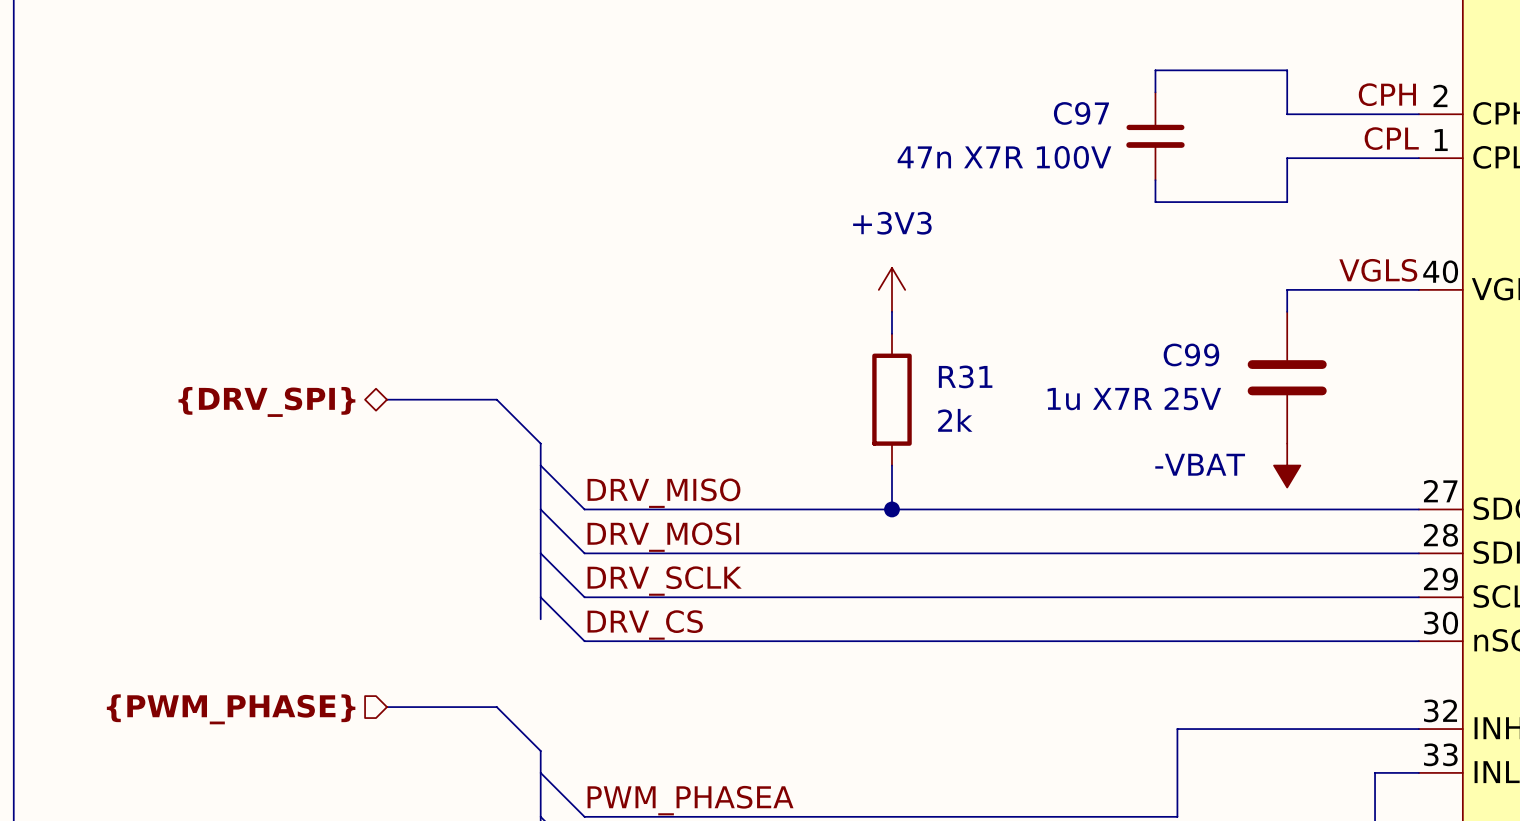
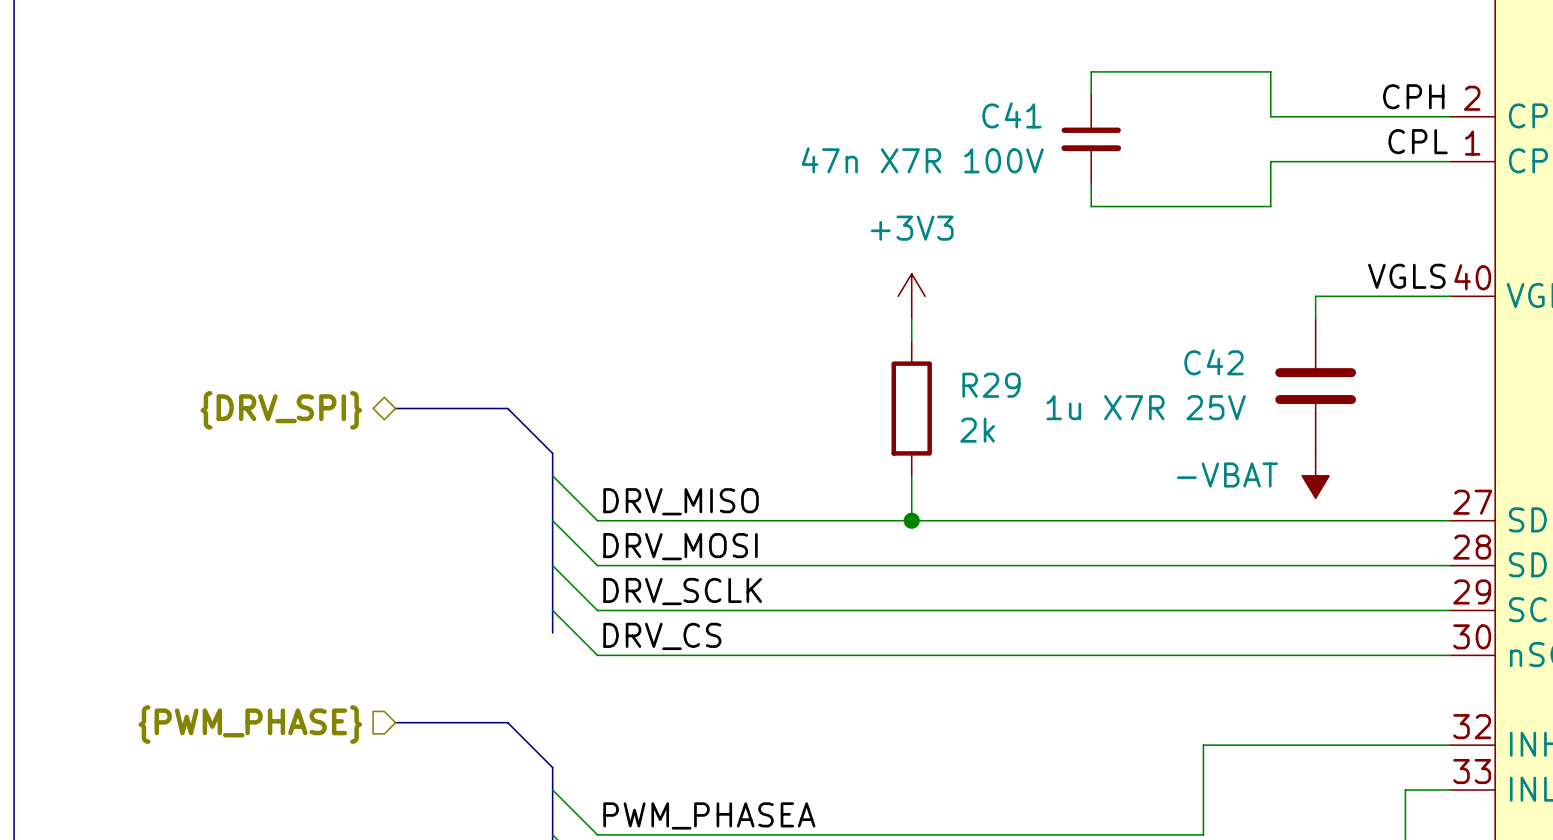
wire: (1155, 70) (1155, 92) -> (1181, 71) (1091, 71) (1091, 94)
wire: (1243, 70) (1287, 70) (1287, 114) -> (1270, 71) (1270, 116) (1315, 116)
C41: none -> 47n X7R 100V (1091, 139)
C97: 47n X7R 100V (1155, 136) -> none
wire: (1287, 158) (1287, 202) (1243, 202) -> (1315, 161) (1270, 161) (1270, 206)
wire: (1155, 180) (1155, 202) -> (1091, 184) (1091, 206) (1181, 206)
C99 name: C99 (1191, 354) -> C42 (1213, 362)
R31 name: R31 (965, 376) -> R29 (991, 385)

